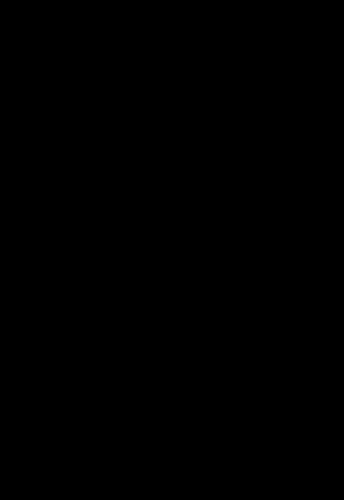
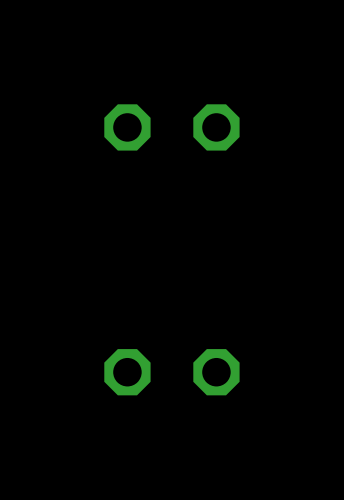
part: none -> (171, 127)
part: none -> (171, 372)

